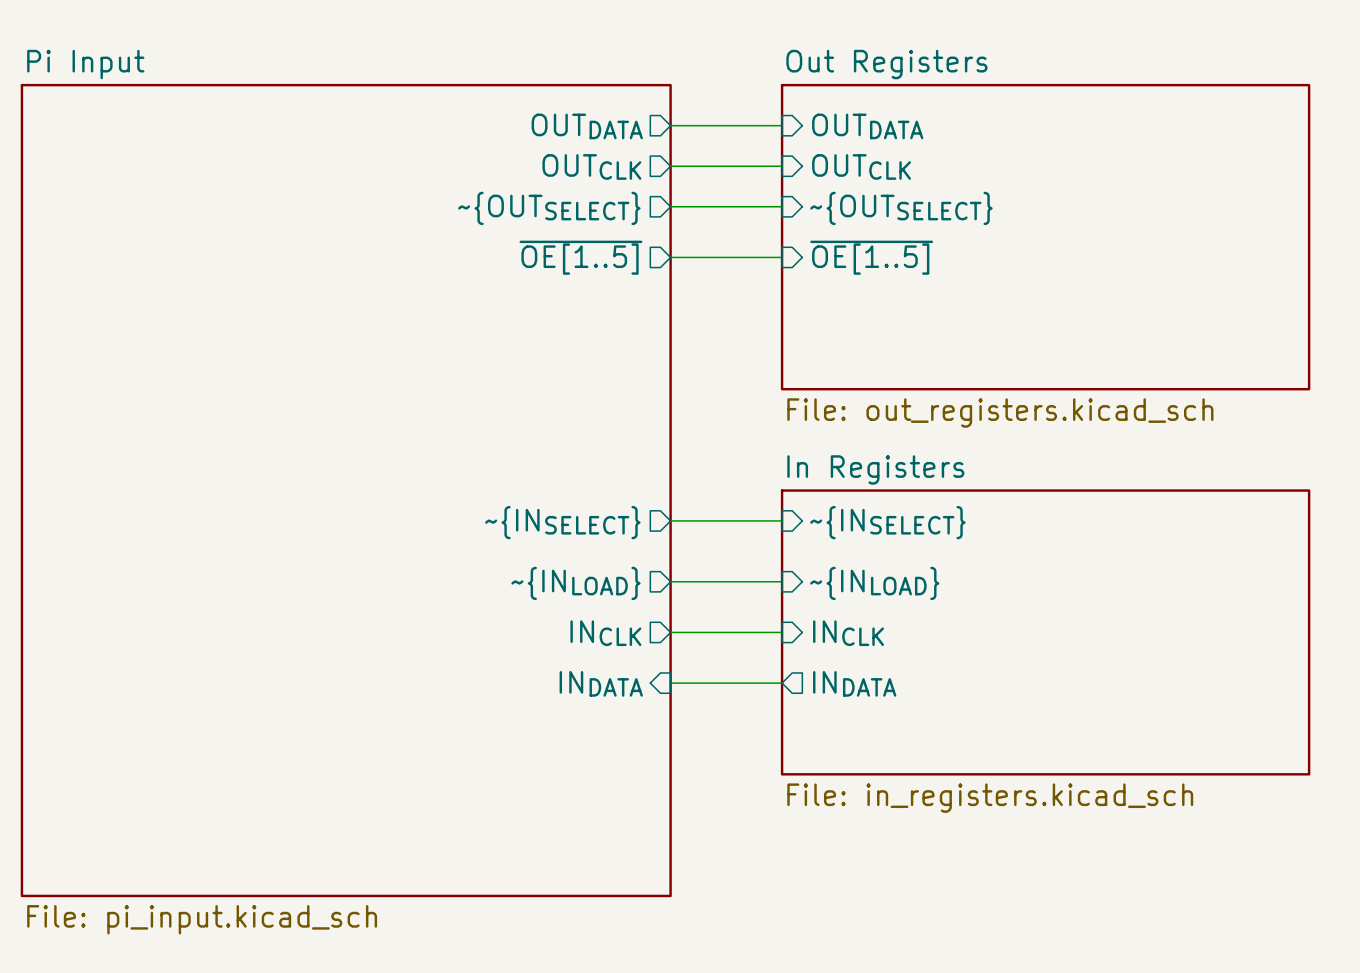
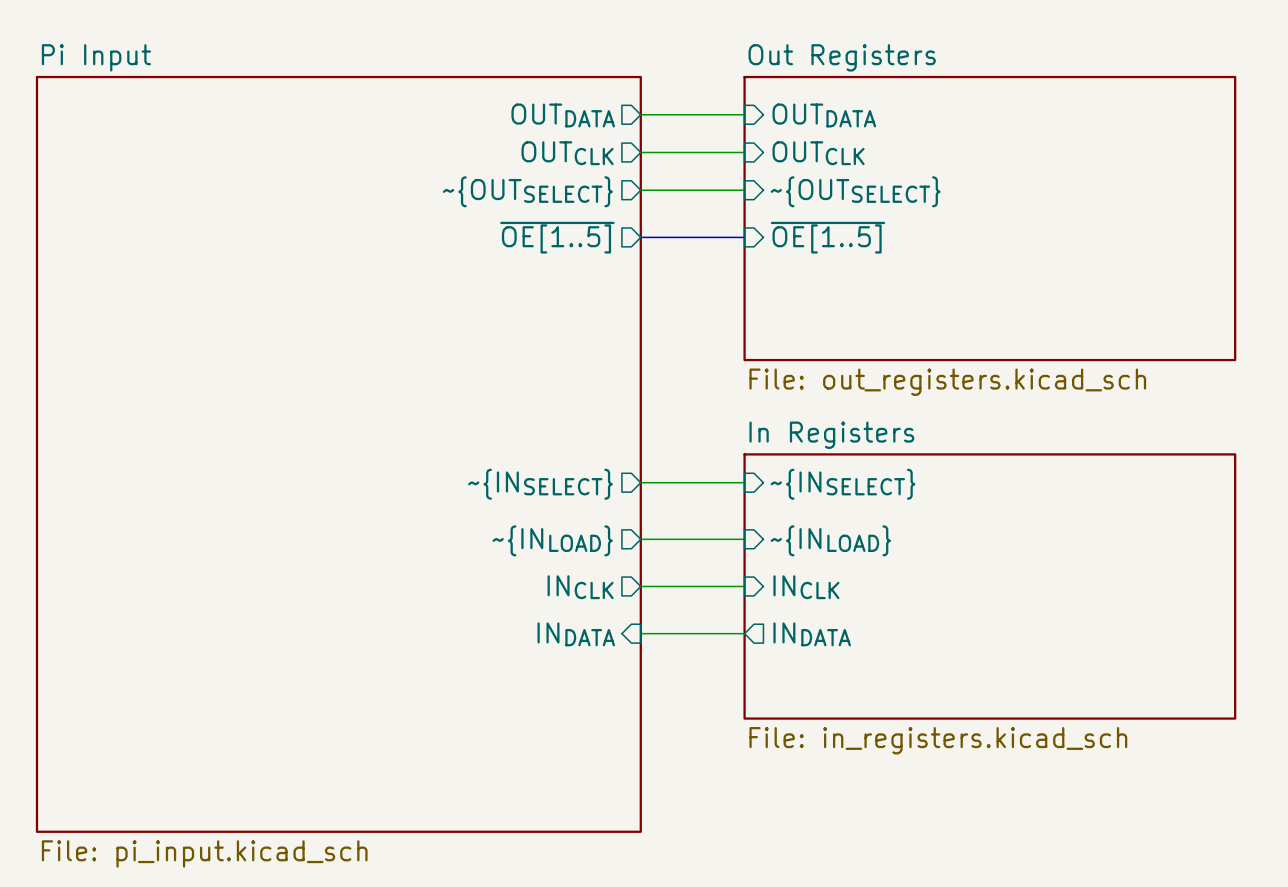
bus: none -> (640, 237) (744, 237)

